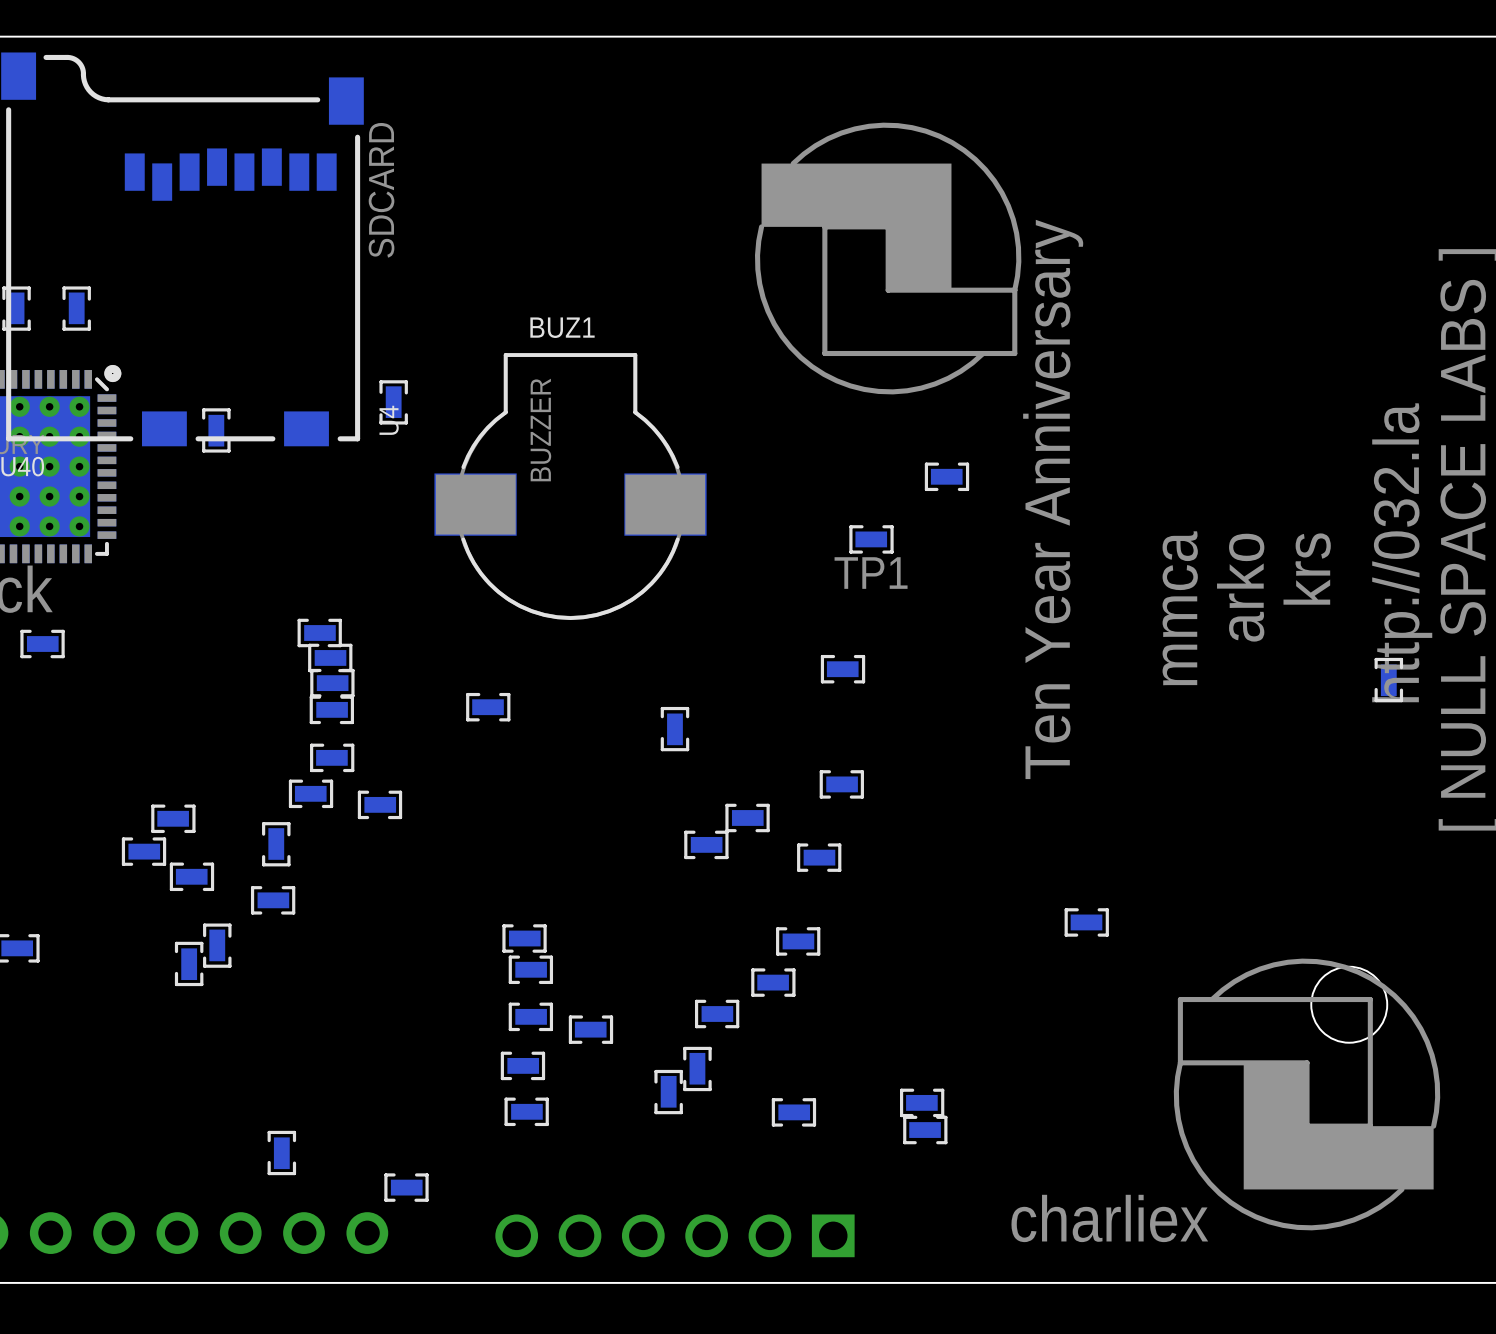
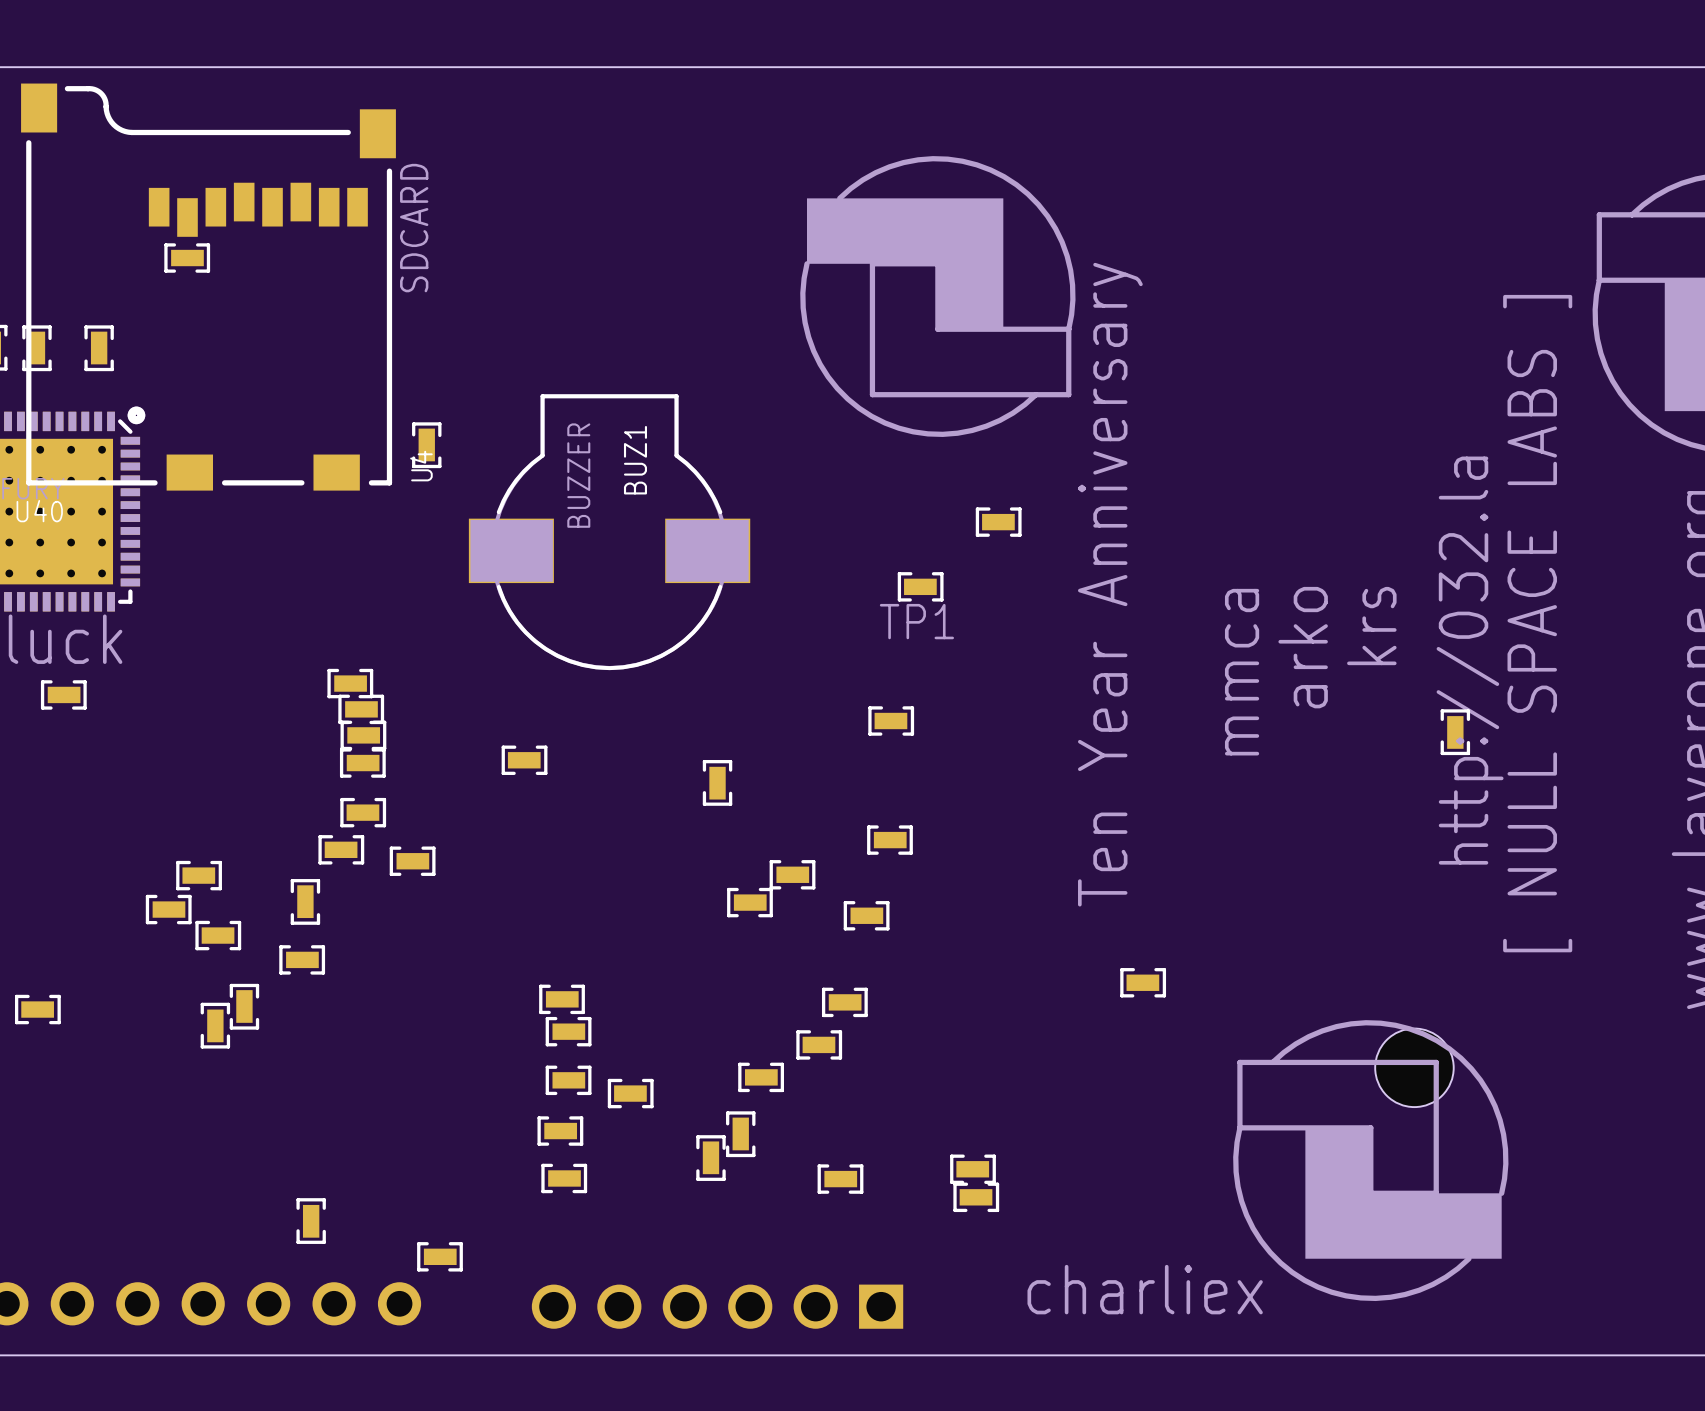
part: none -> (187, 258)
BUZ1 name rotation: 0° (562, 327) -> 90° counterclockwise (635, 460)
BUZ1 name position: BUZ1 (562, 327) -> BUZ1 (635, 460)
part: (216, 430) -> none

